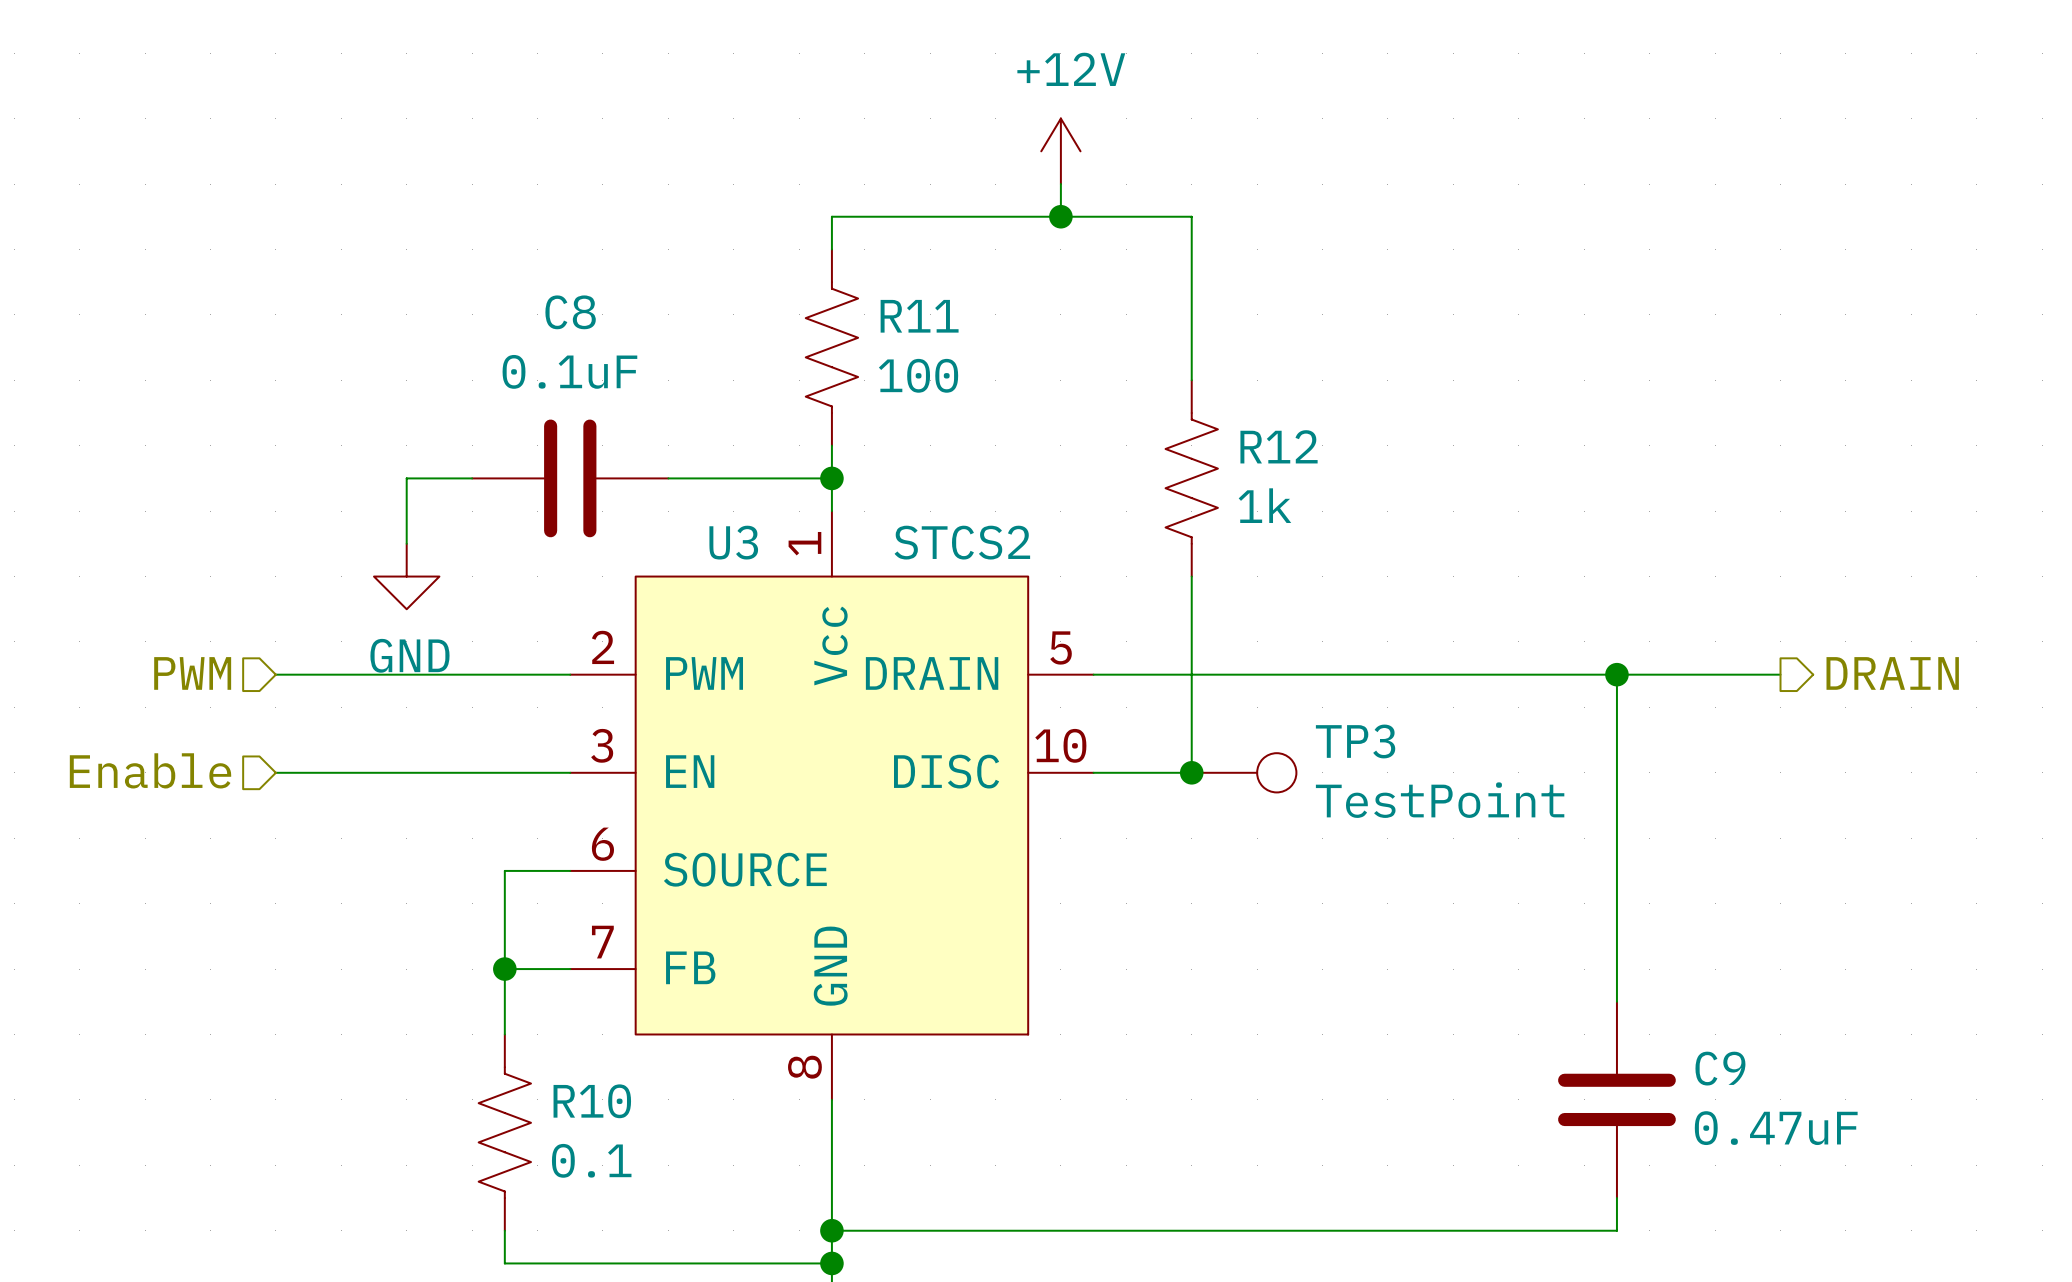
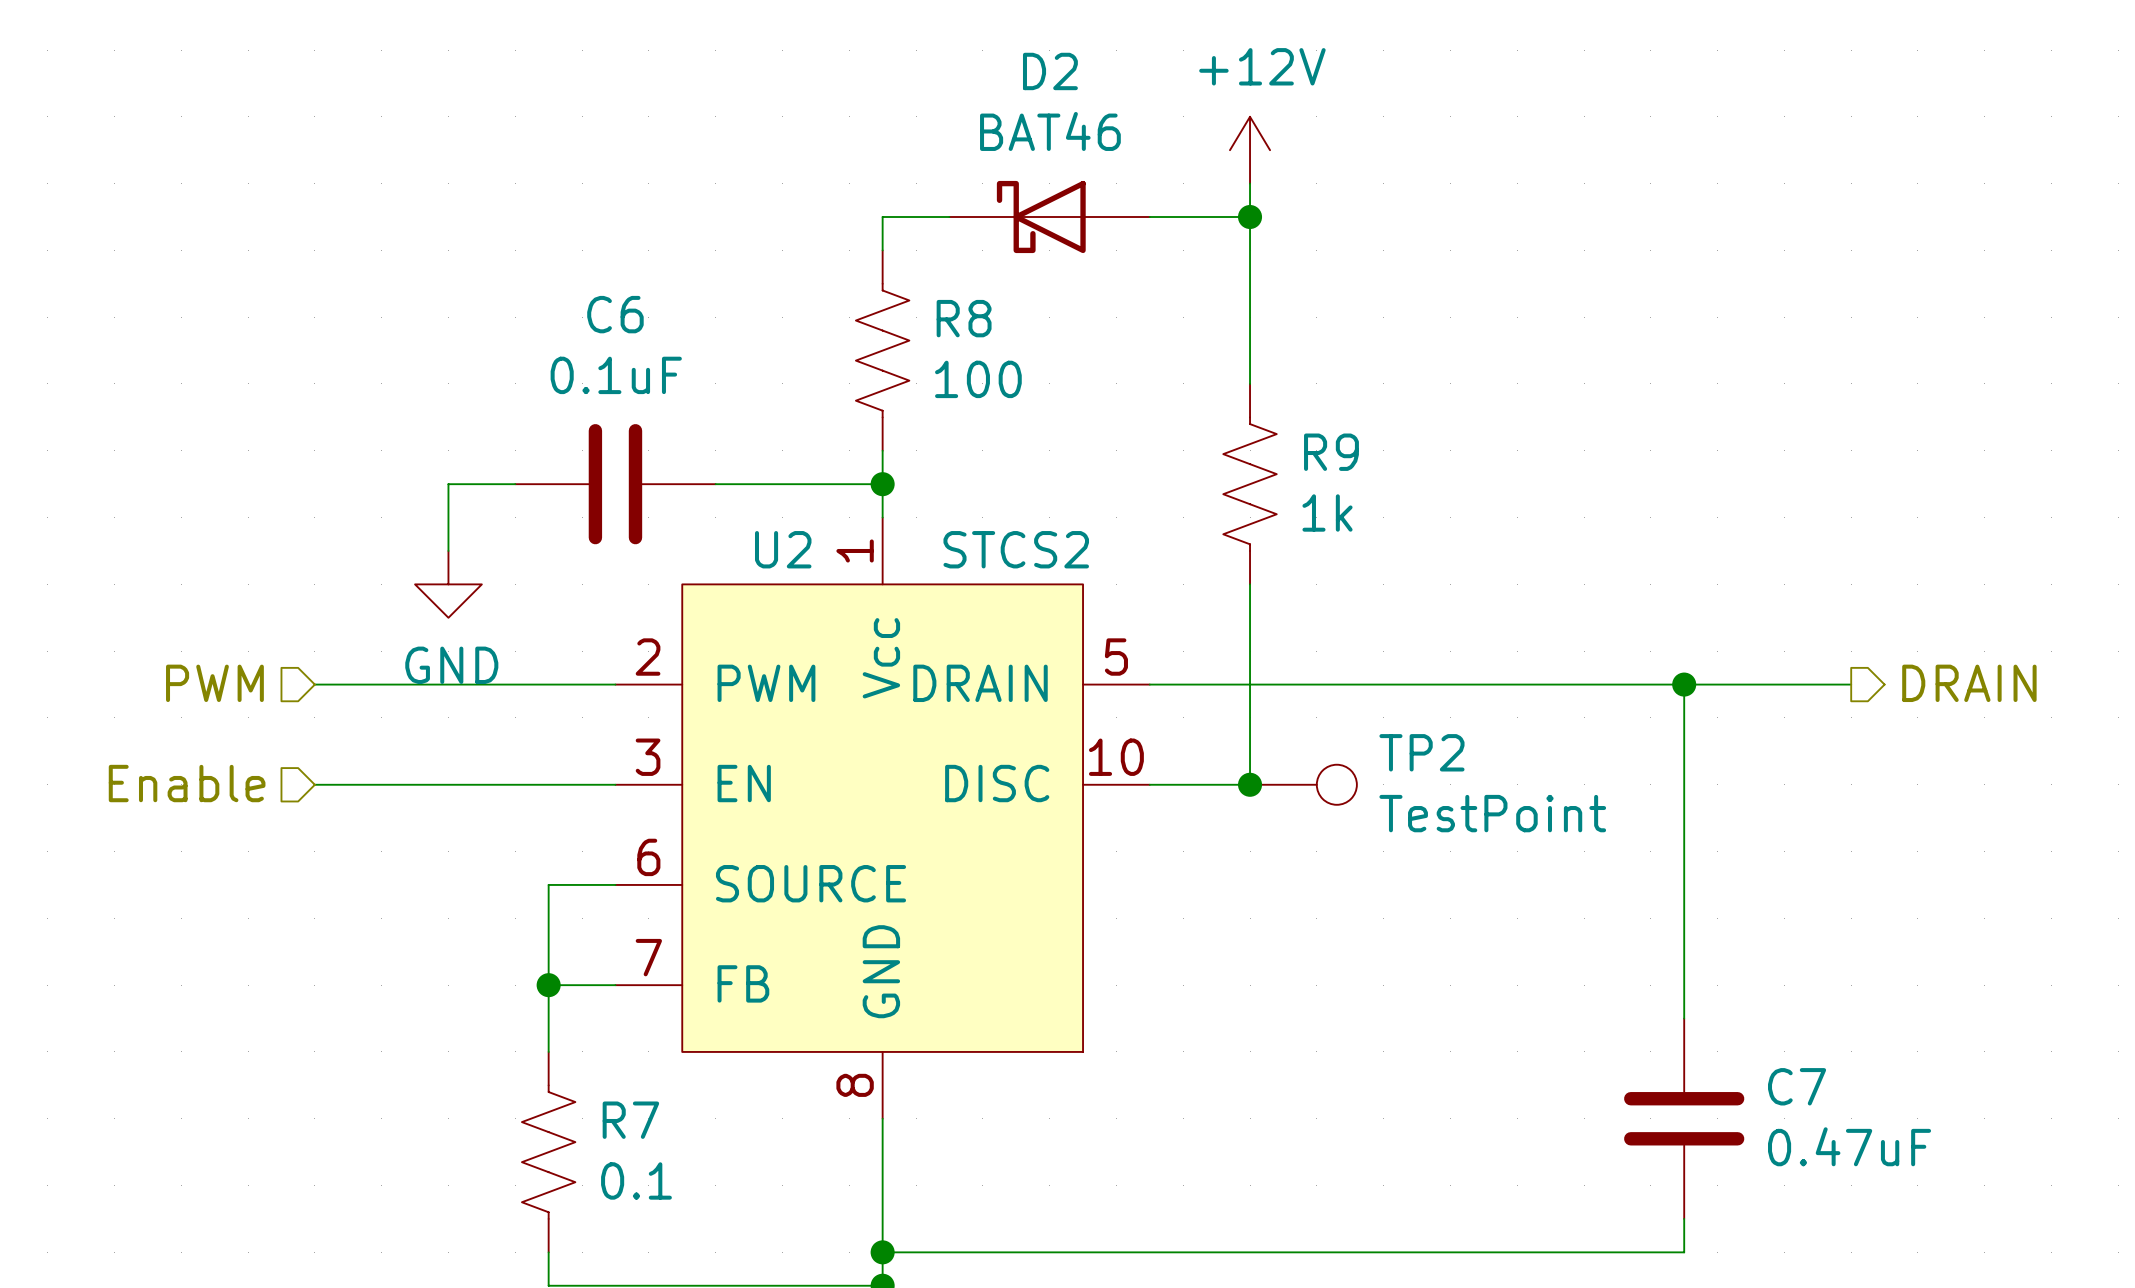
power symbol position: +12V (1060, 151) -> +12V (1250, 150)
wire: (1060, 184) (1060, 216) -> (1250, 183) (1250, 217)
D2: none -> BAT46 (1049, 217)
junction position: (1060, 216) -> (1250, 217)
C8 name: C8 (570, 312) -> C6 (615, 314)
R11 name: R11 (919, 316) -> R8 (964, 318)
R12 name: R12 (1279, 446) -> R9 (1331, 452)
U3 name: U3 (733, 542) -> U2 (783, 549)
TP3 name: TP3 (1355, 741) -> TP2 (1421, 752)
C9 name: C9 (1720, 1068) -> C7 (1797, 1086)
R10 name: R10 (592, 1101) -> R7 (630, 1120)

